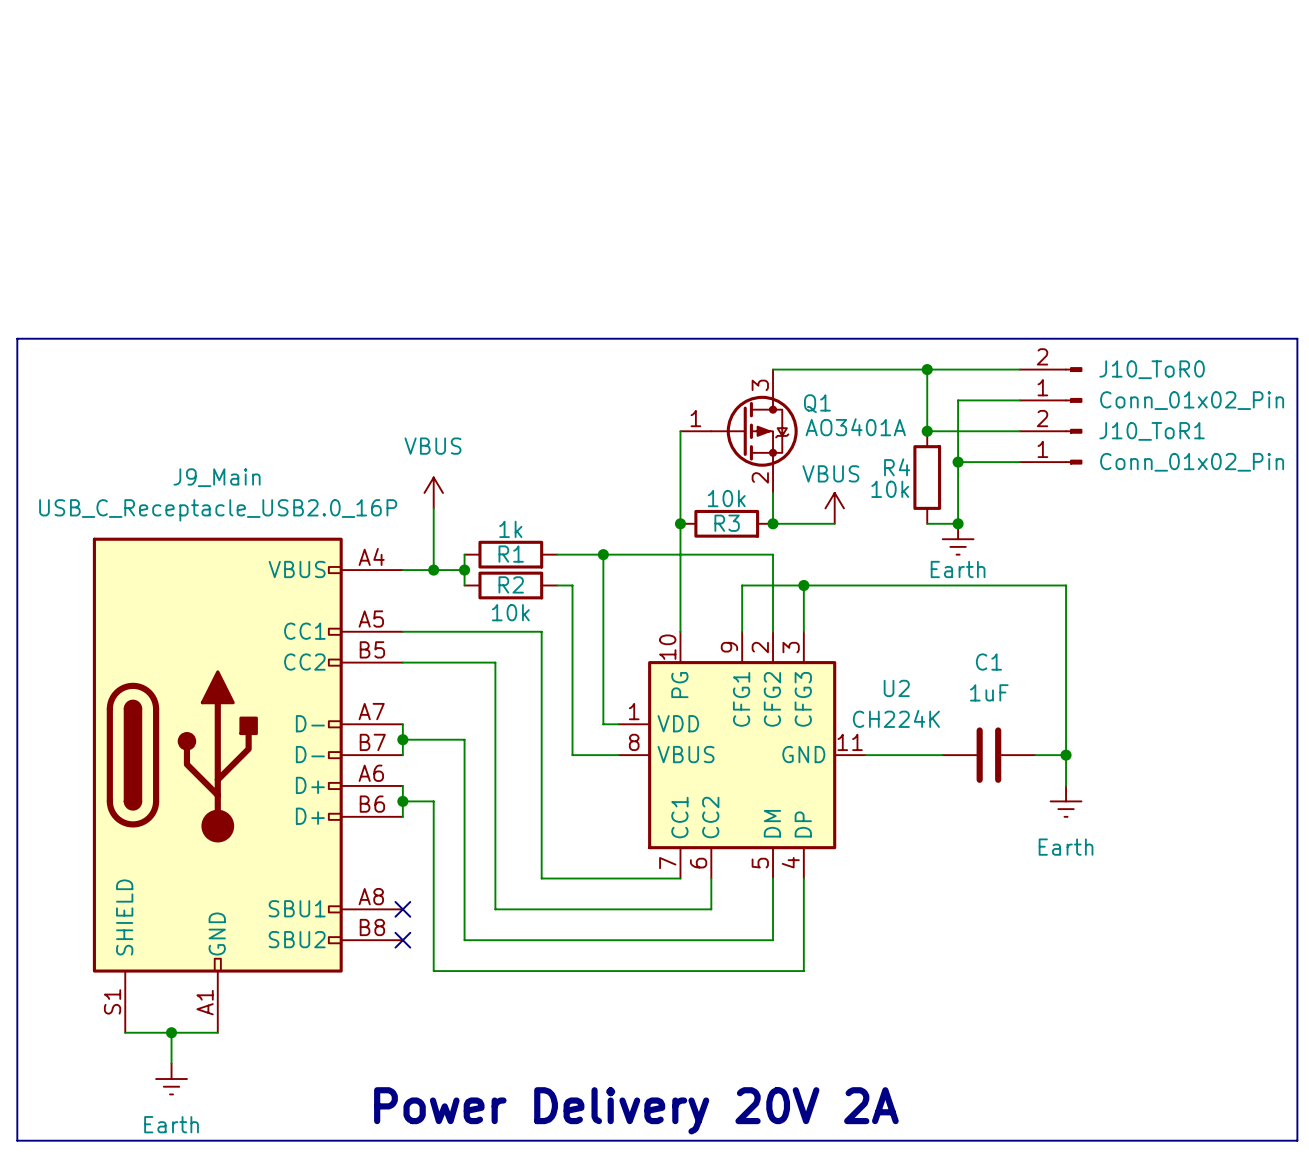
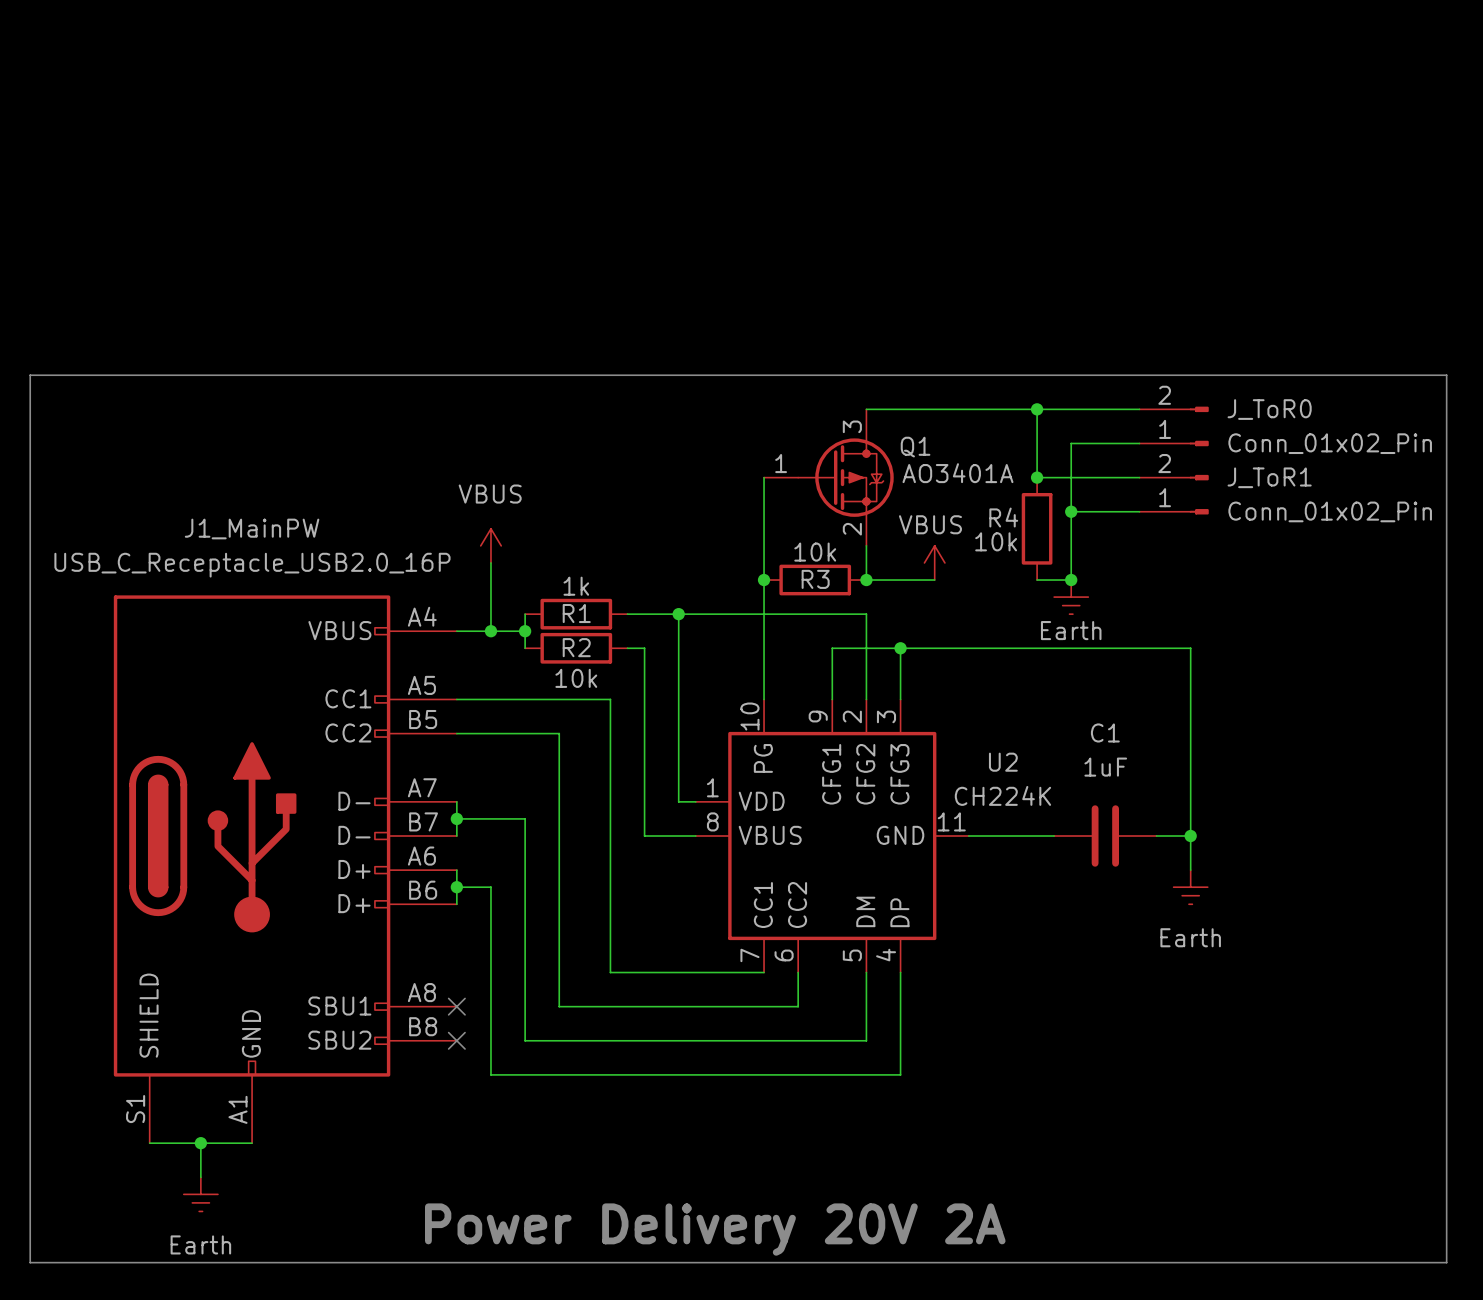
J10_ToR0 name: J10_ToR0 (1152, 369) -> J_ToR0 (1269, 409)
J10_ToR1 name: J10_ToR1 (1152, 431) -> J_ToR1 (1269, 477)
J9_Main name: J9_Main (217, 477) -> J1_MainPW (252, 528)

